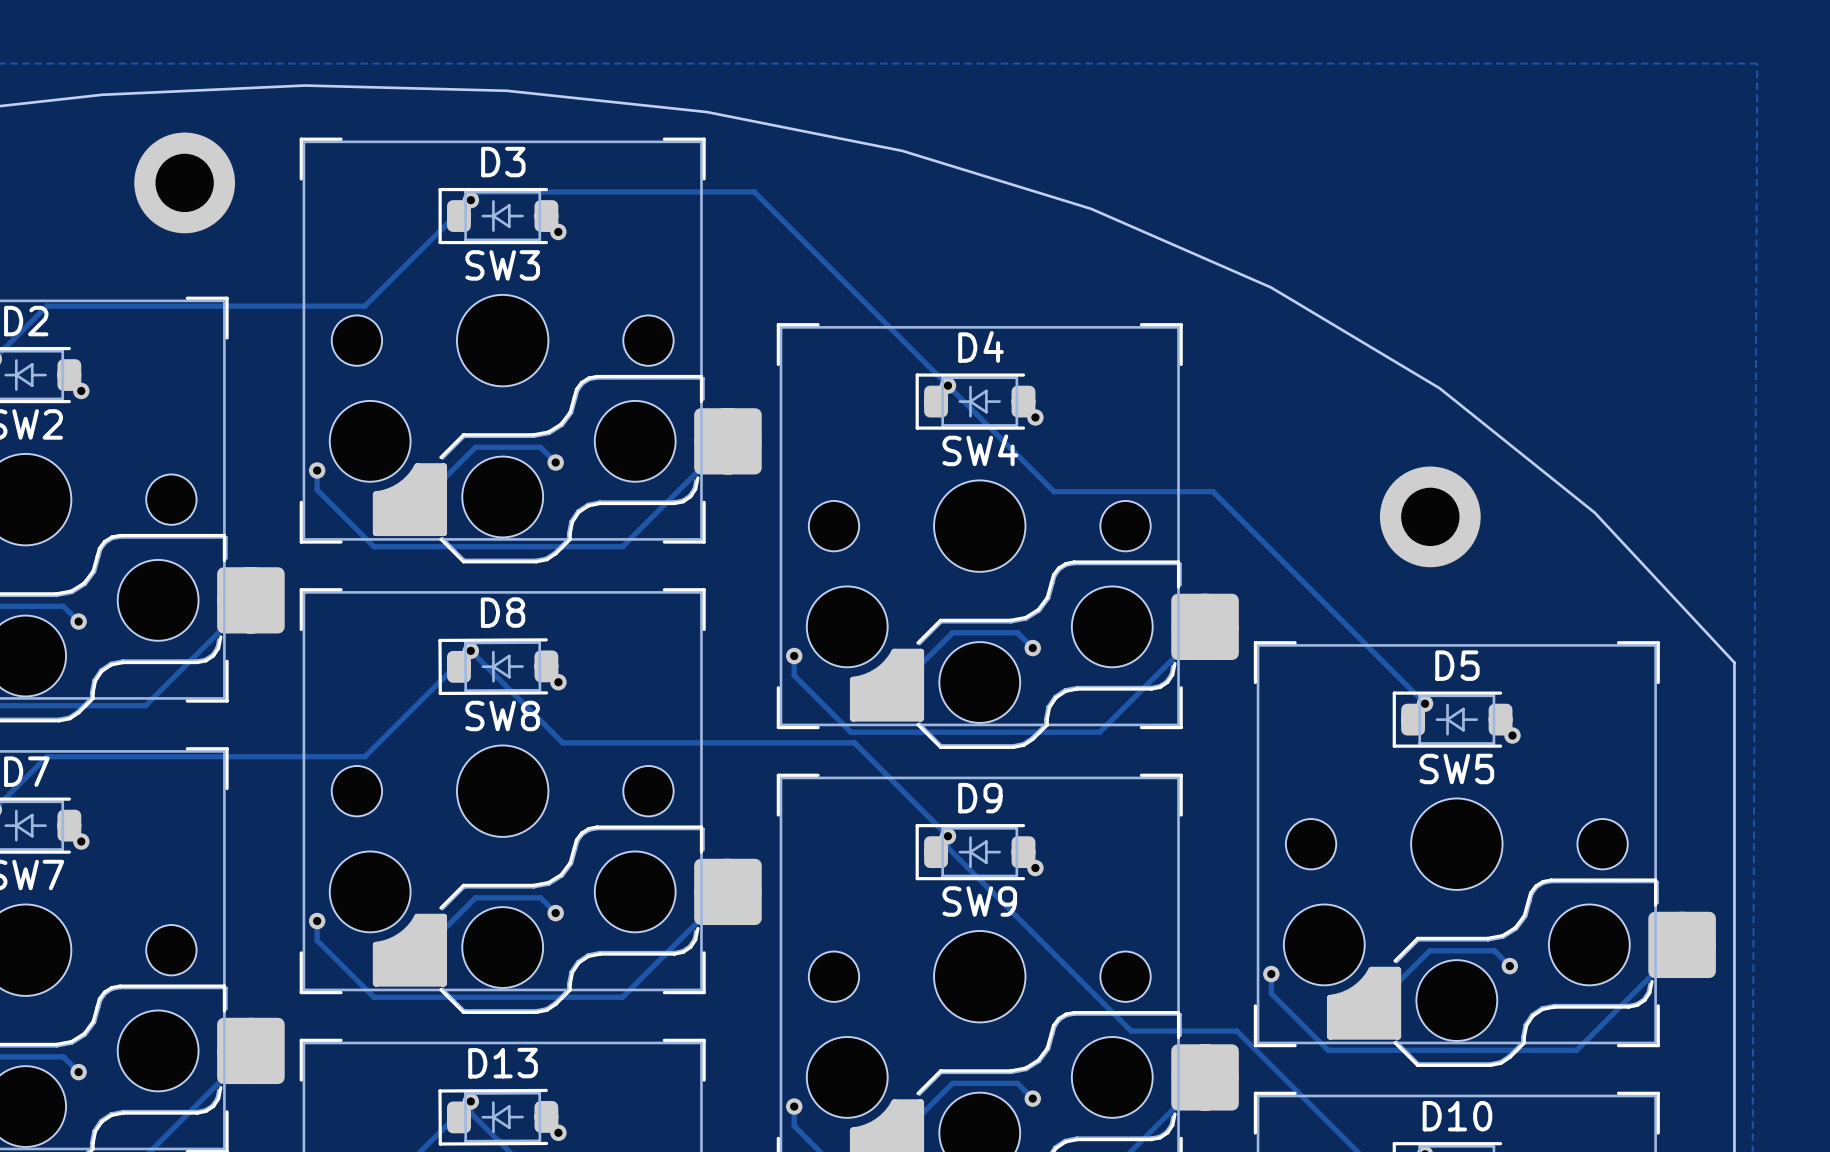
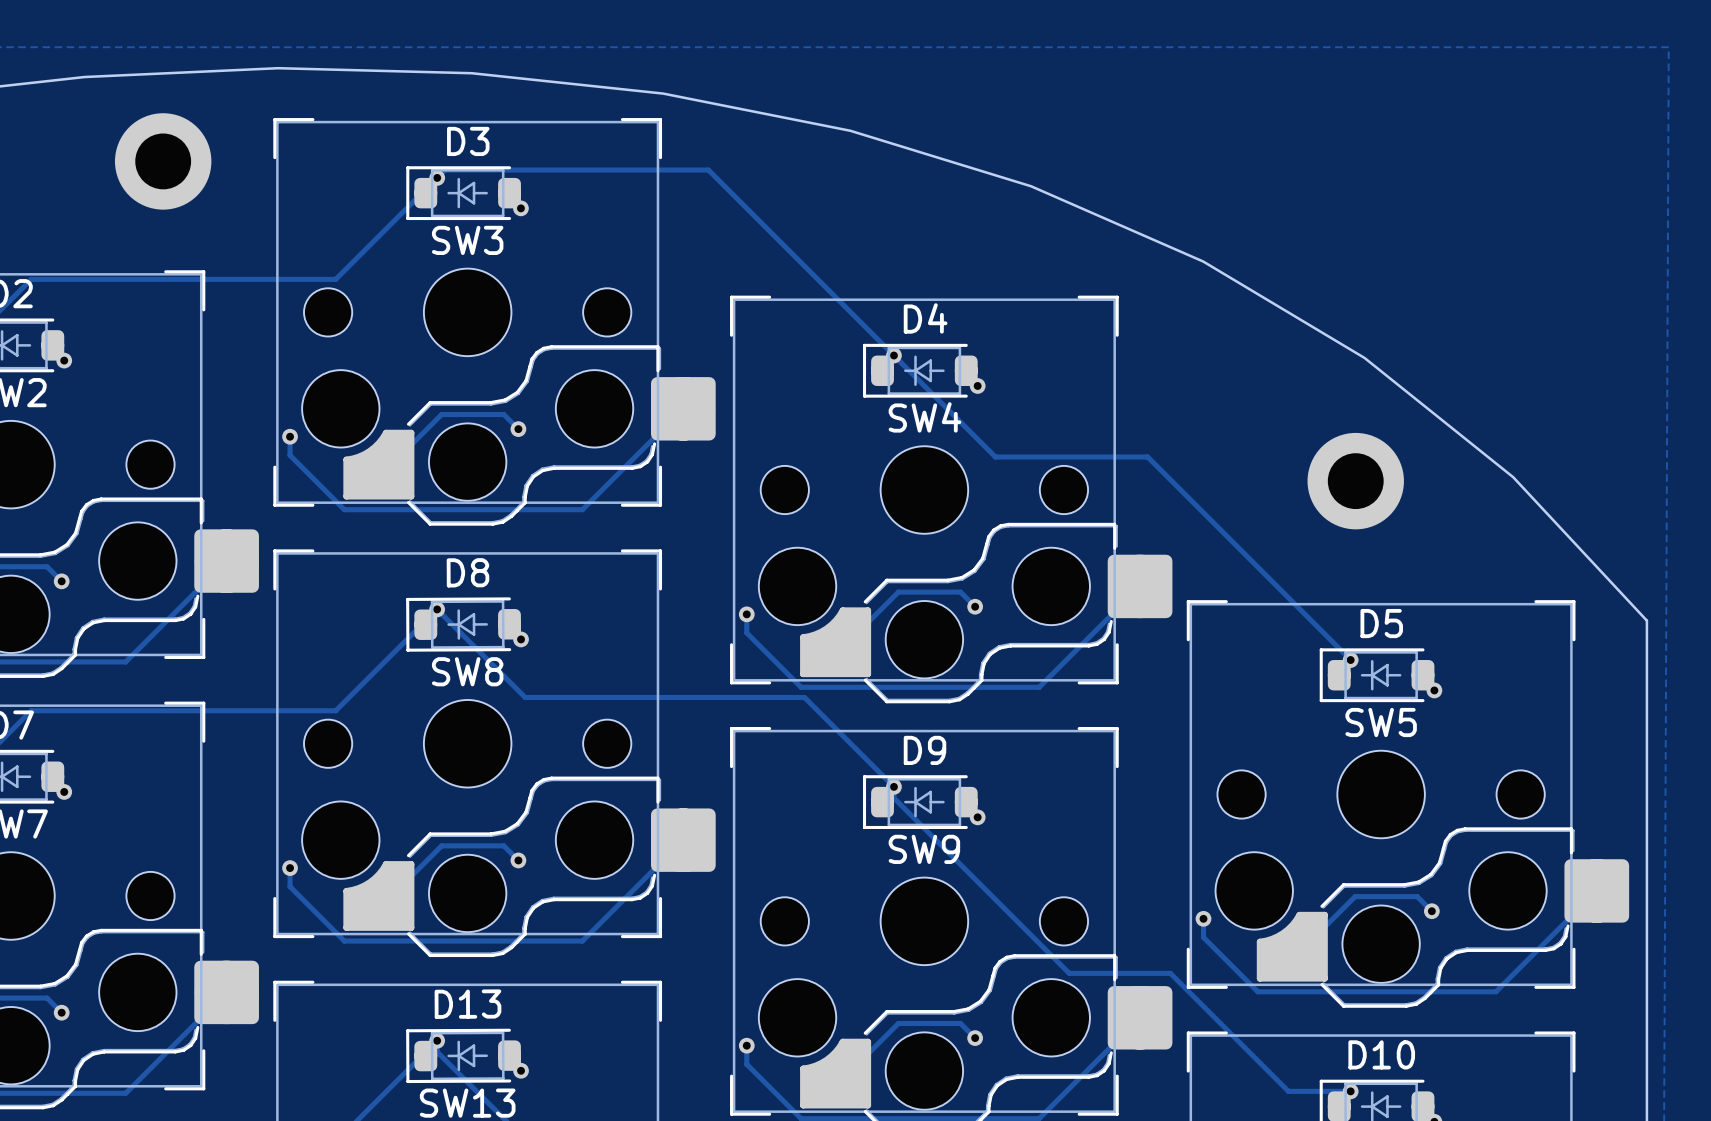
SW3 footprint: [299, 137, 762, 564] -> [273, 118, 716, 526]
SW4 footprint: [776, 323, 1239, 749] -> [730, 295, 1173, 704]
SW8 footprint: [299, 588, 762, 1014] -> [273, 549, 716, 958]
SW5 footprint: [1253, 641, 1716, 1067] -> [1186, 600, 1630, 1008]

